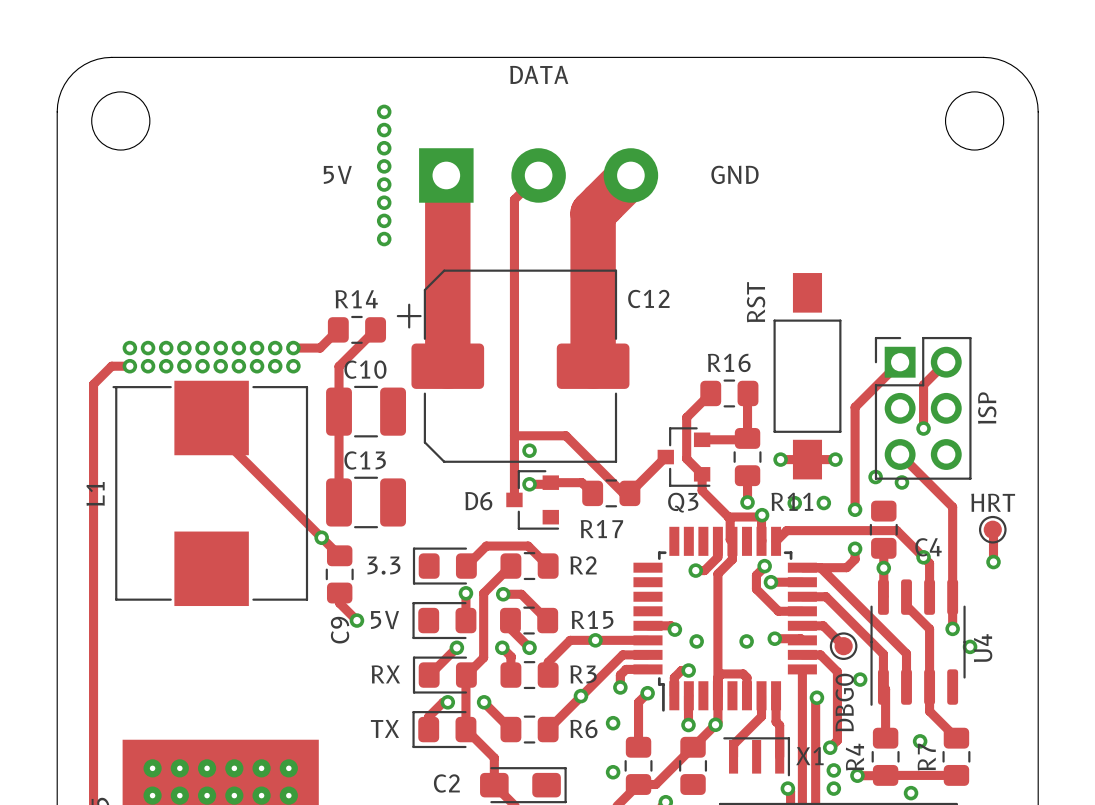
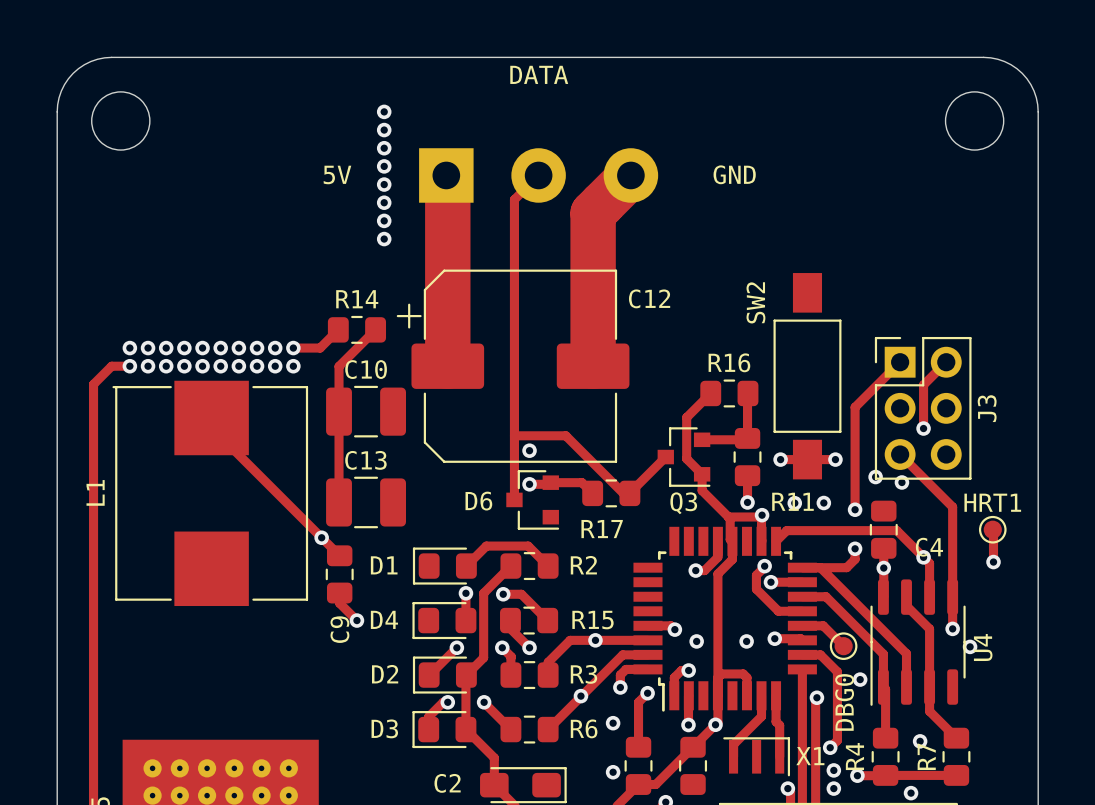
RST name: RST (756, 302) -> SW2 (755, 302)
ISP name: ISP (987, 408) -> J3 (987, 408)
HRT name: HRT (993, 502) -> HRT1 (992, 502)
3.3 name: 3.3 (383, 565) -> D1 (384, 565)
5V name: 5V (385, 619) -> D4 (384, 619)
RX name: RX (385, 674) -> D2 (385, 674)
TX name: TX (384, 728) -> D3 (384, 728)

